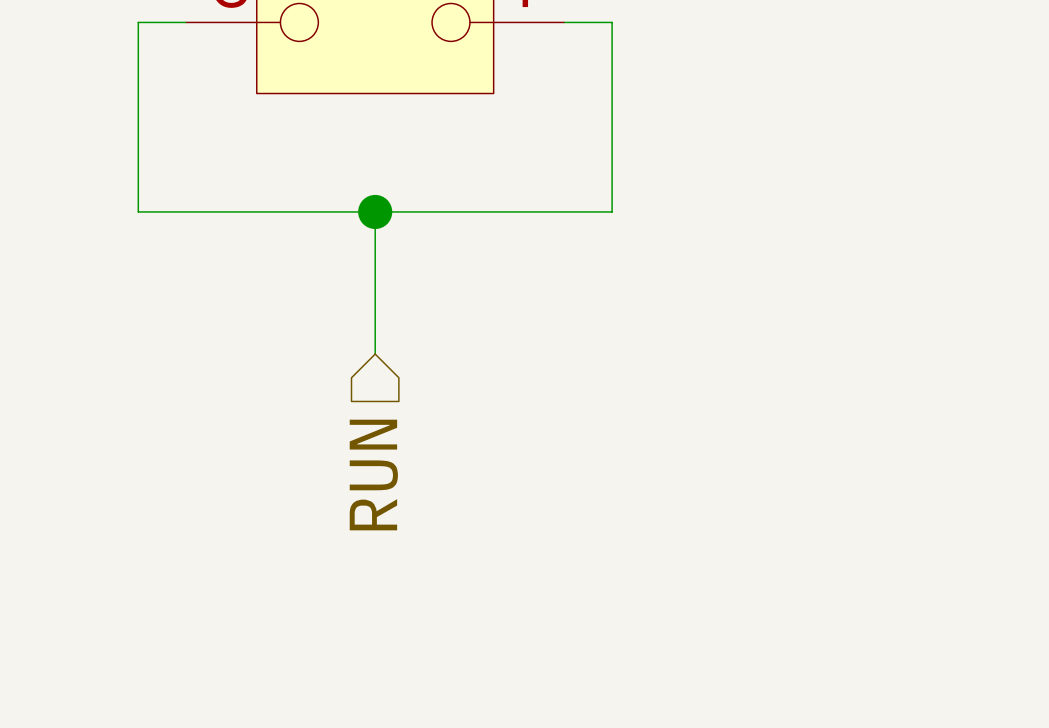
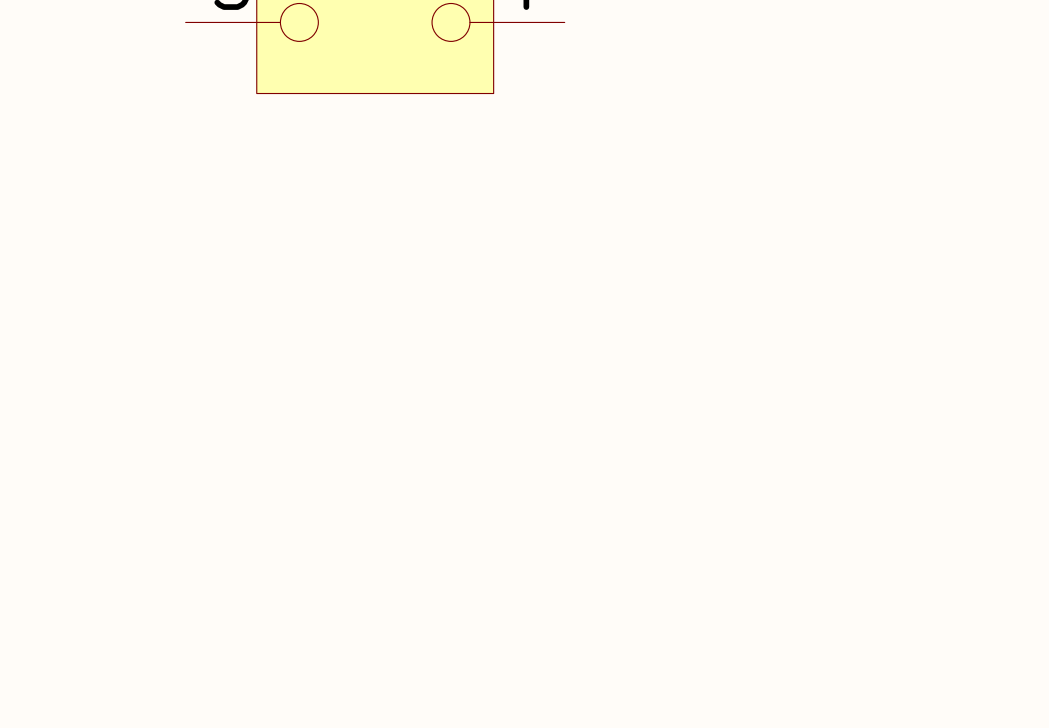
wire: (185, 22) (138, 22) (138, 211) (612, 211) (612, 22) (564, 22) -> none
wire: (375, 211) (375, 354) -> none
junction: (375, 211) -> none
hierarchical label: RUN (373, 475) -> none

